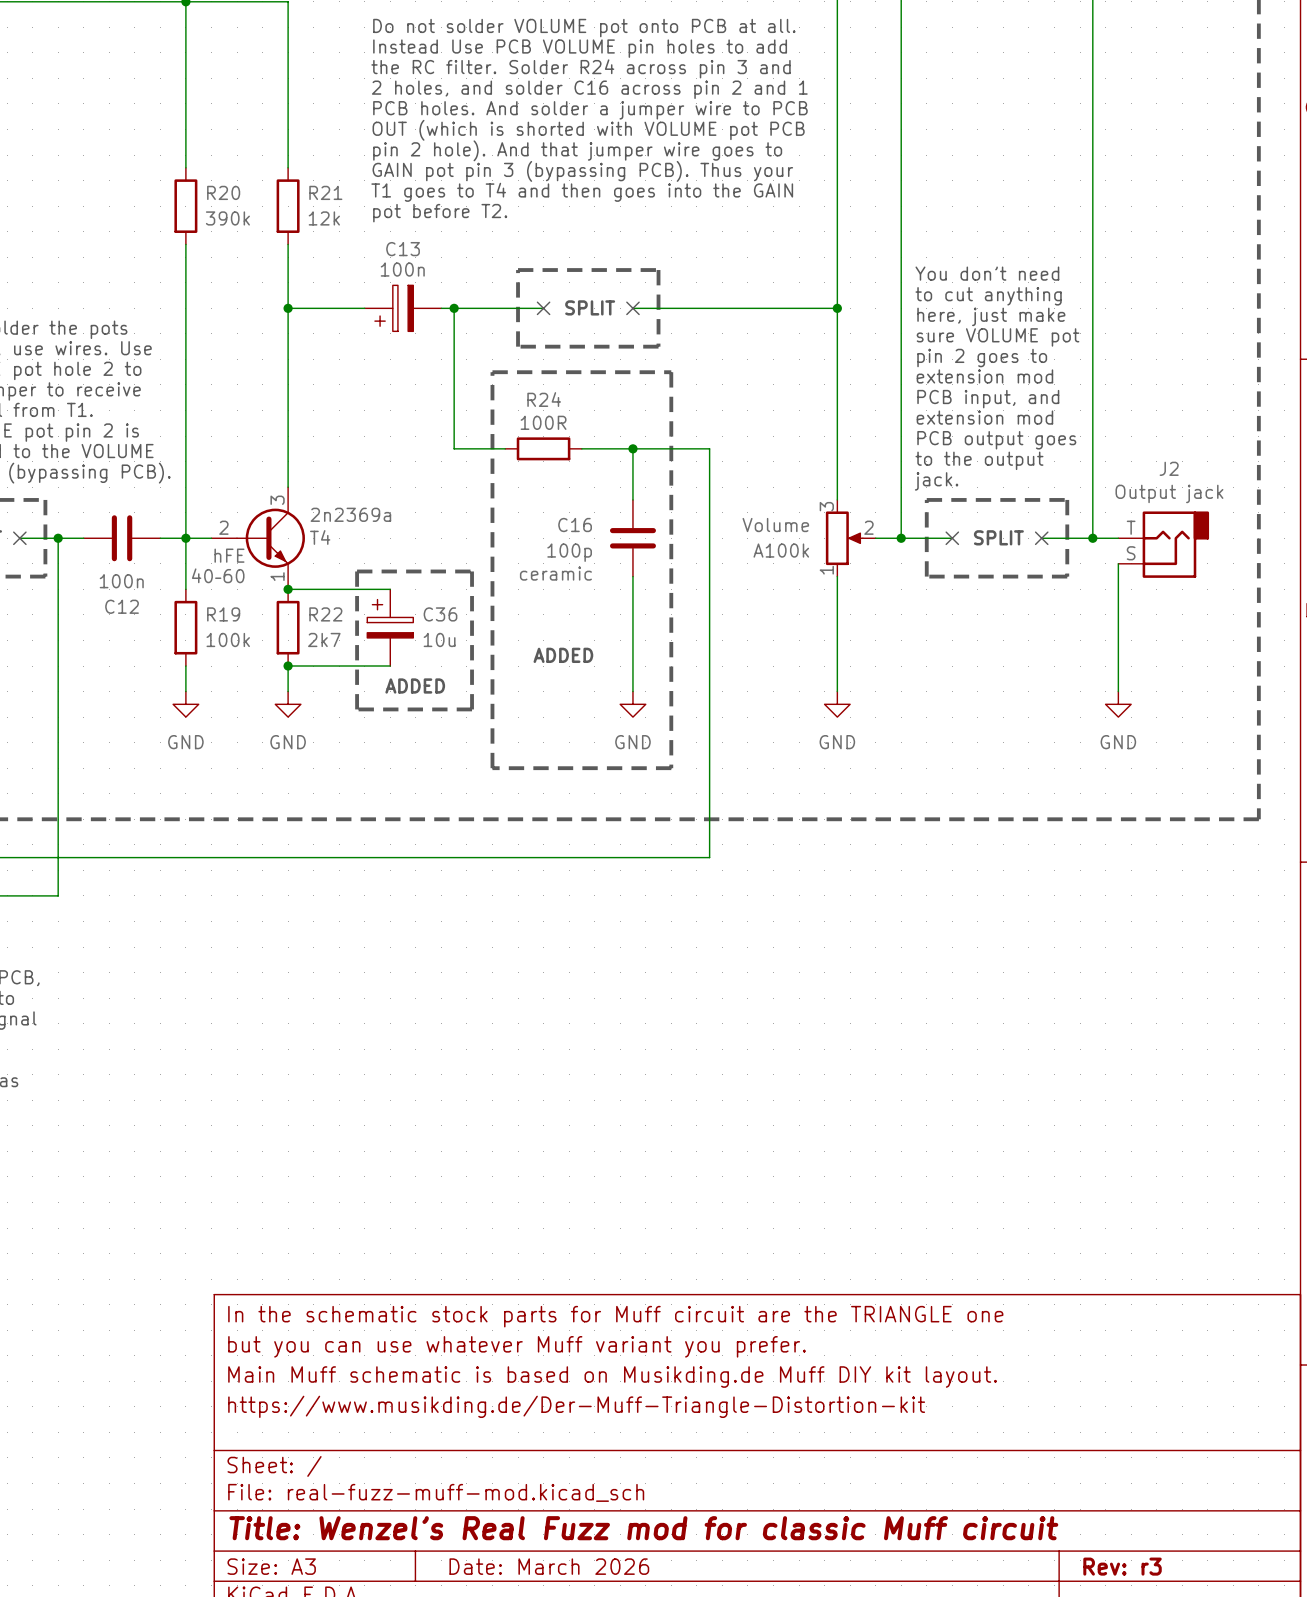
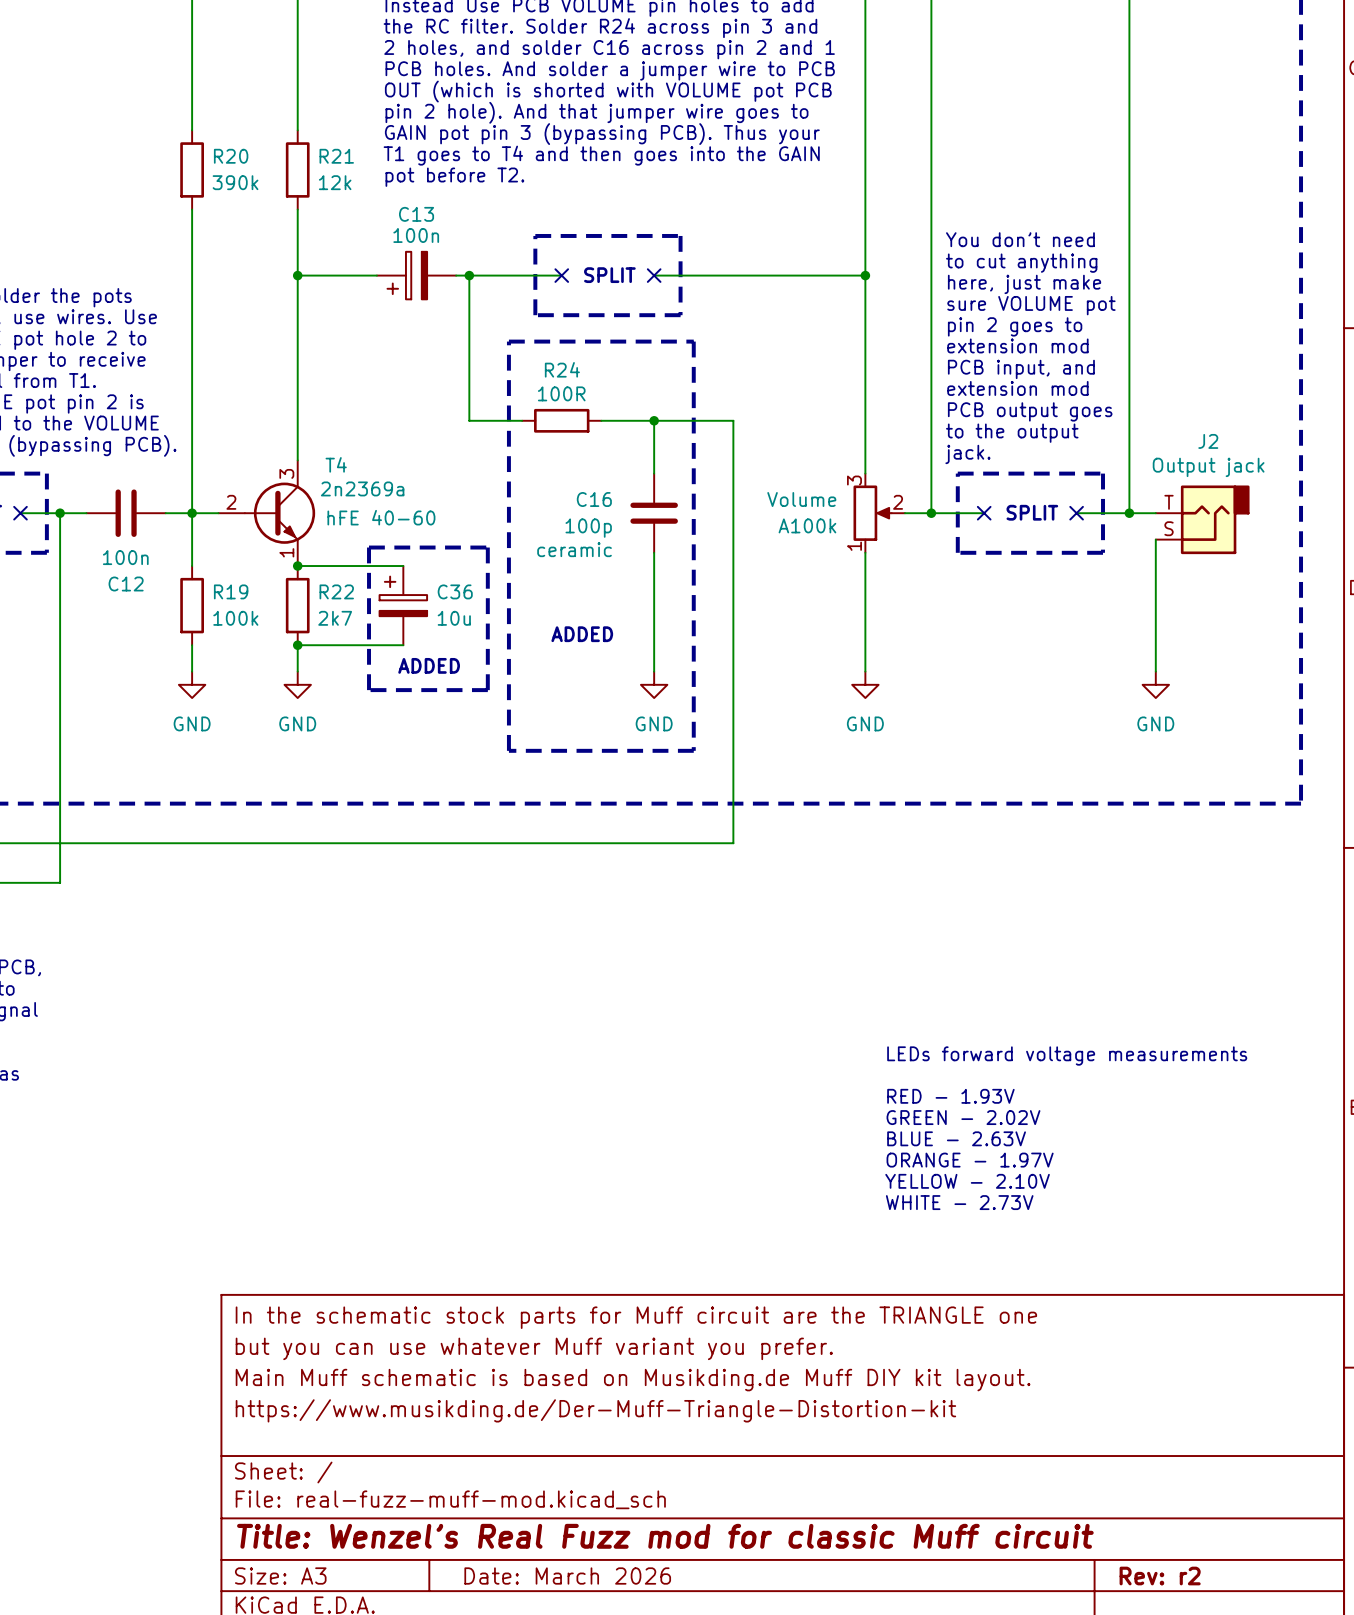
T4 name position: T4 (320, 537) -> T4 (336, 464)
T4 text: none -> hFE 40-60 (381, 517)
T4 text: hFE (229, 555) -> none
T4 text: 40–60 (218, 575) -> none
text: none -> LEDs forward voltage measurements (1067, 1056)
text: none -> RED - 1.93V (950, 1096)
text: none -> GREEN - 2.02V (963, 1117)
text: none -> BLUE - 2.63V (956, 1138)
text: none -> ORANGE - 1.97V (970, 1160)
text: none -> YELLOW - 2.10V (967, 1181)
text: none -> WHITE - 2.73V (959, 1202)
title block: Rev: r3 (1122, 1566) -> Rev: r2 (1160, 1576)

